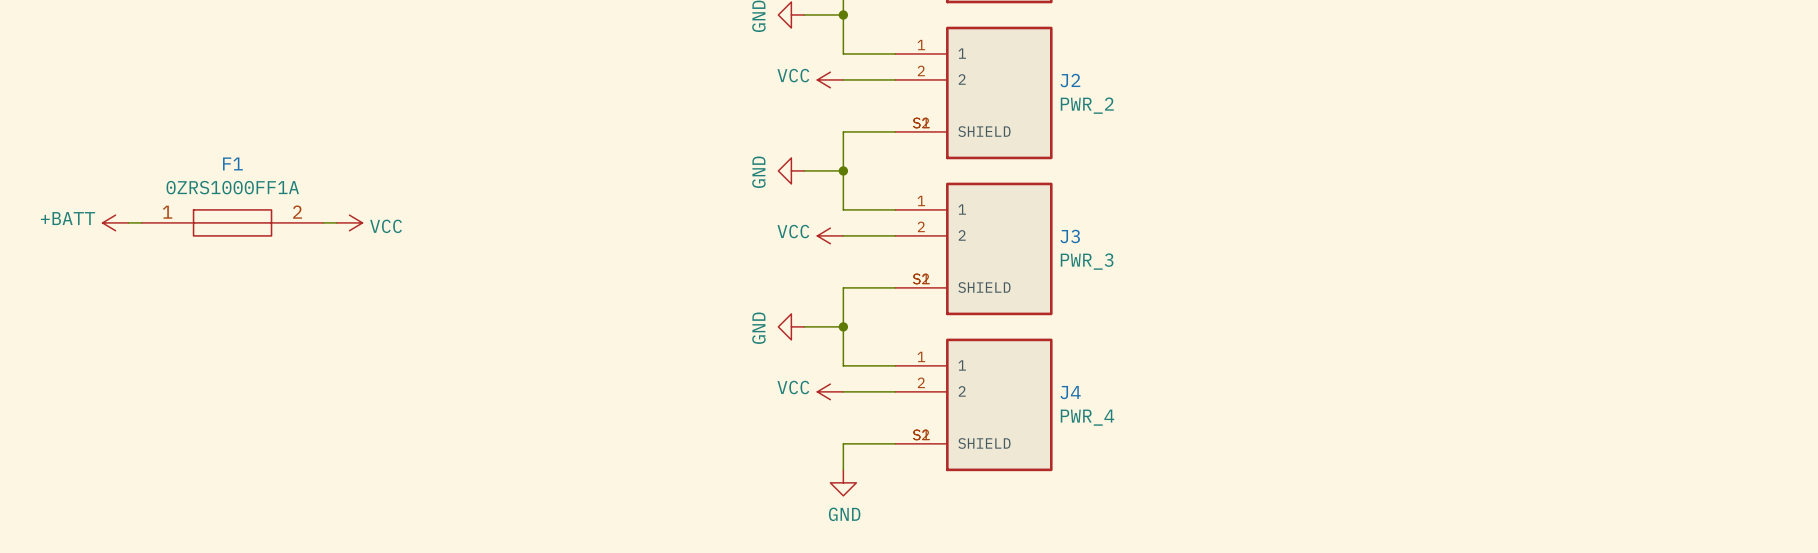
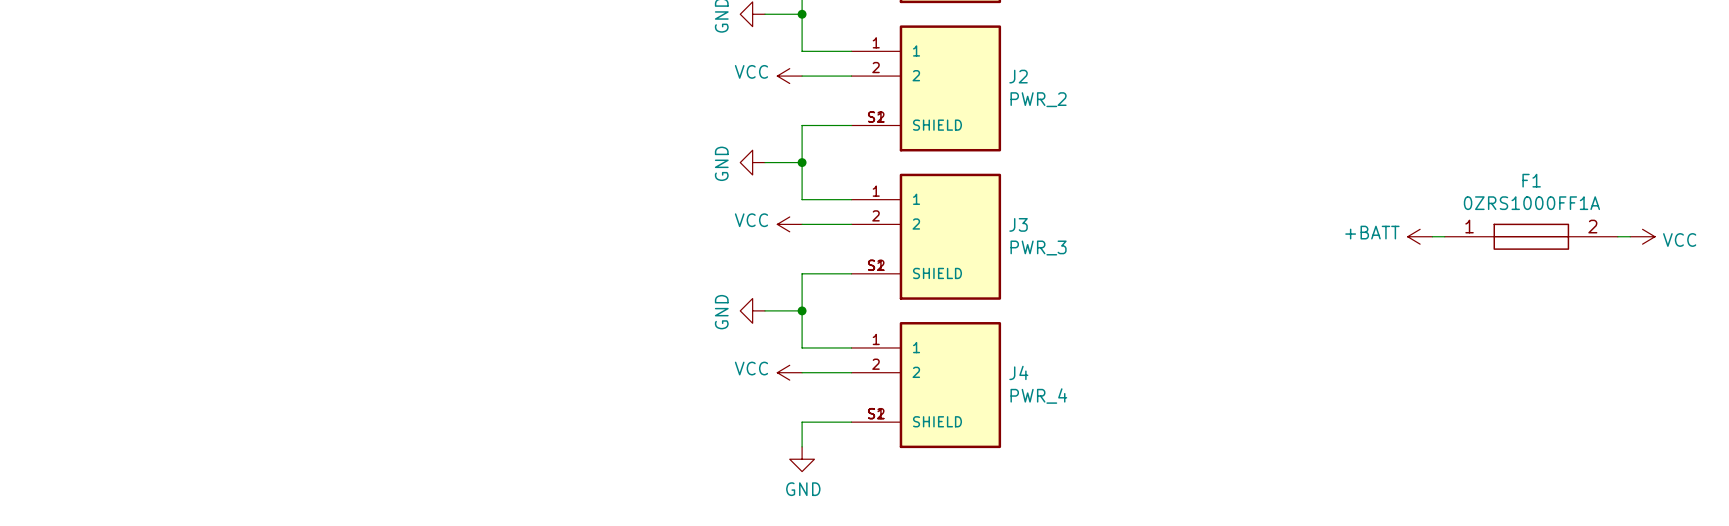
power symbol: +BATT (115, 222) -> none
wire: (128, 222) (141, 222) -> none
F1 position: (232, 222) -> (1531, 236)
wire: (323, 222) (336, 222) -> none
power symbol: VCC (349, 222) -> none
power symbol: none -> +BATT (1420, 236)
wire: none -> (1432, 236) (1444, 236)
wire: none -> (1617, 236) (1630, 236)
power symbol: none -> VCC (1642, 236)

